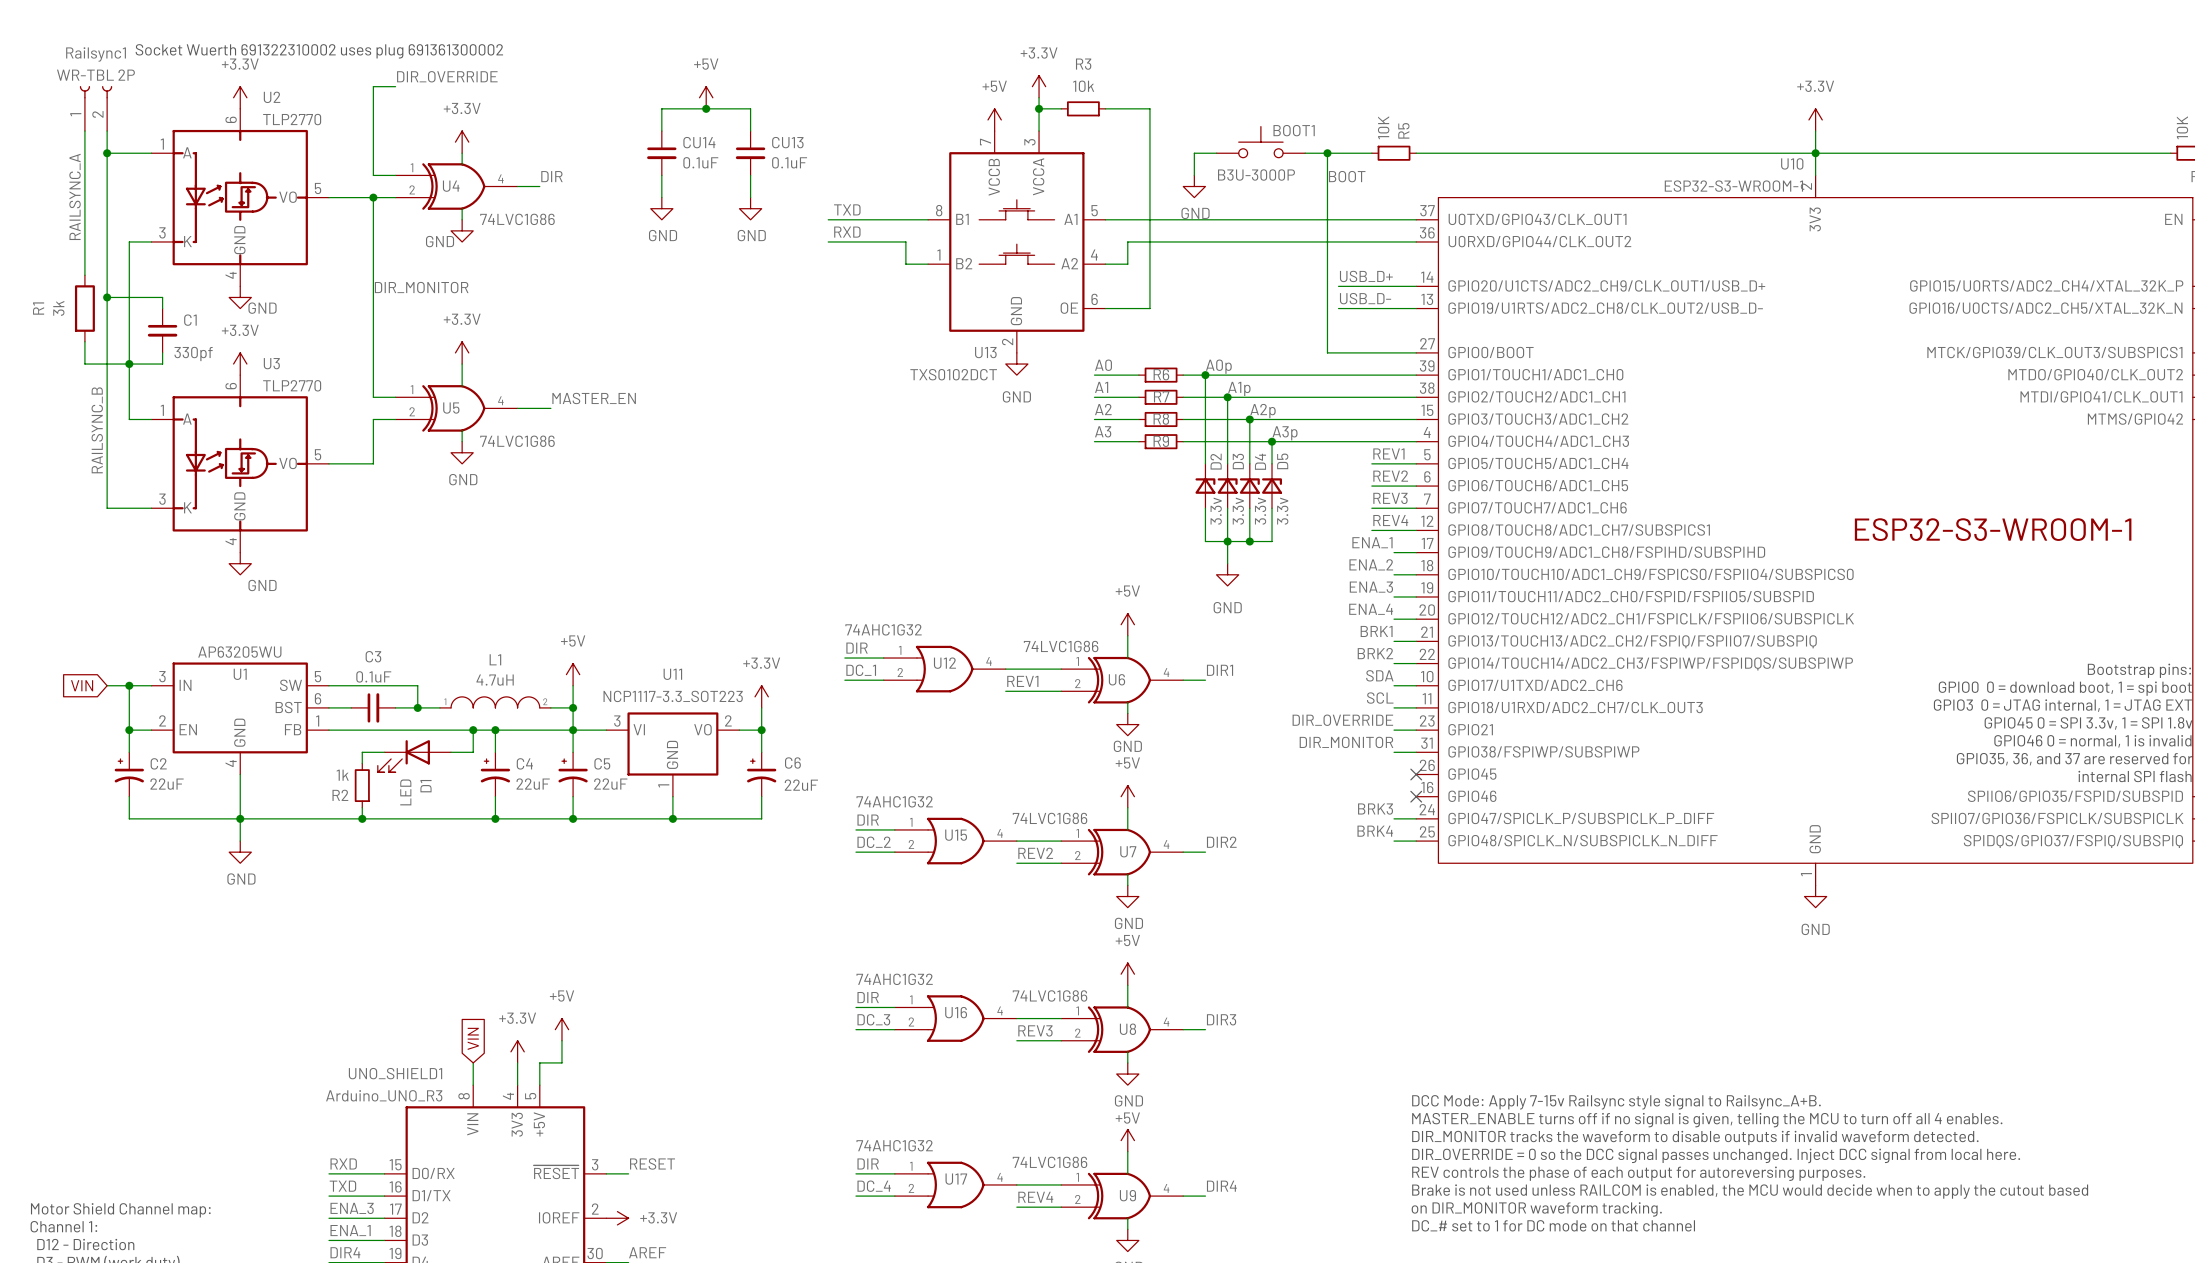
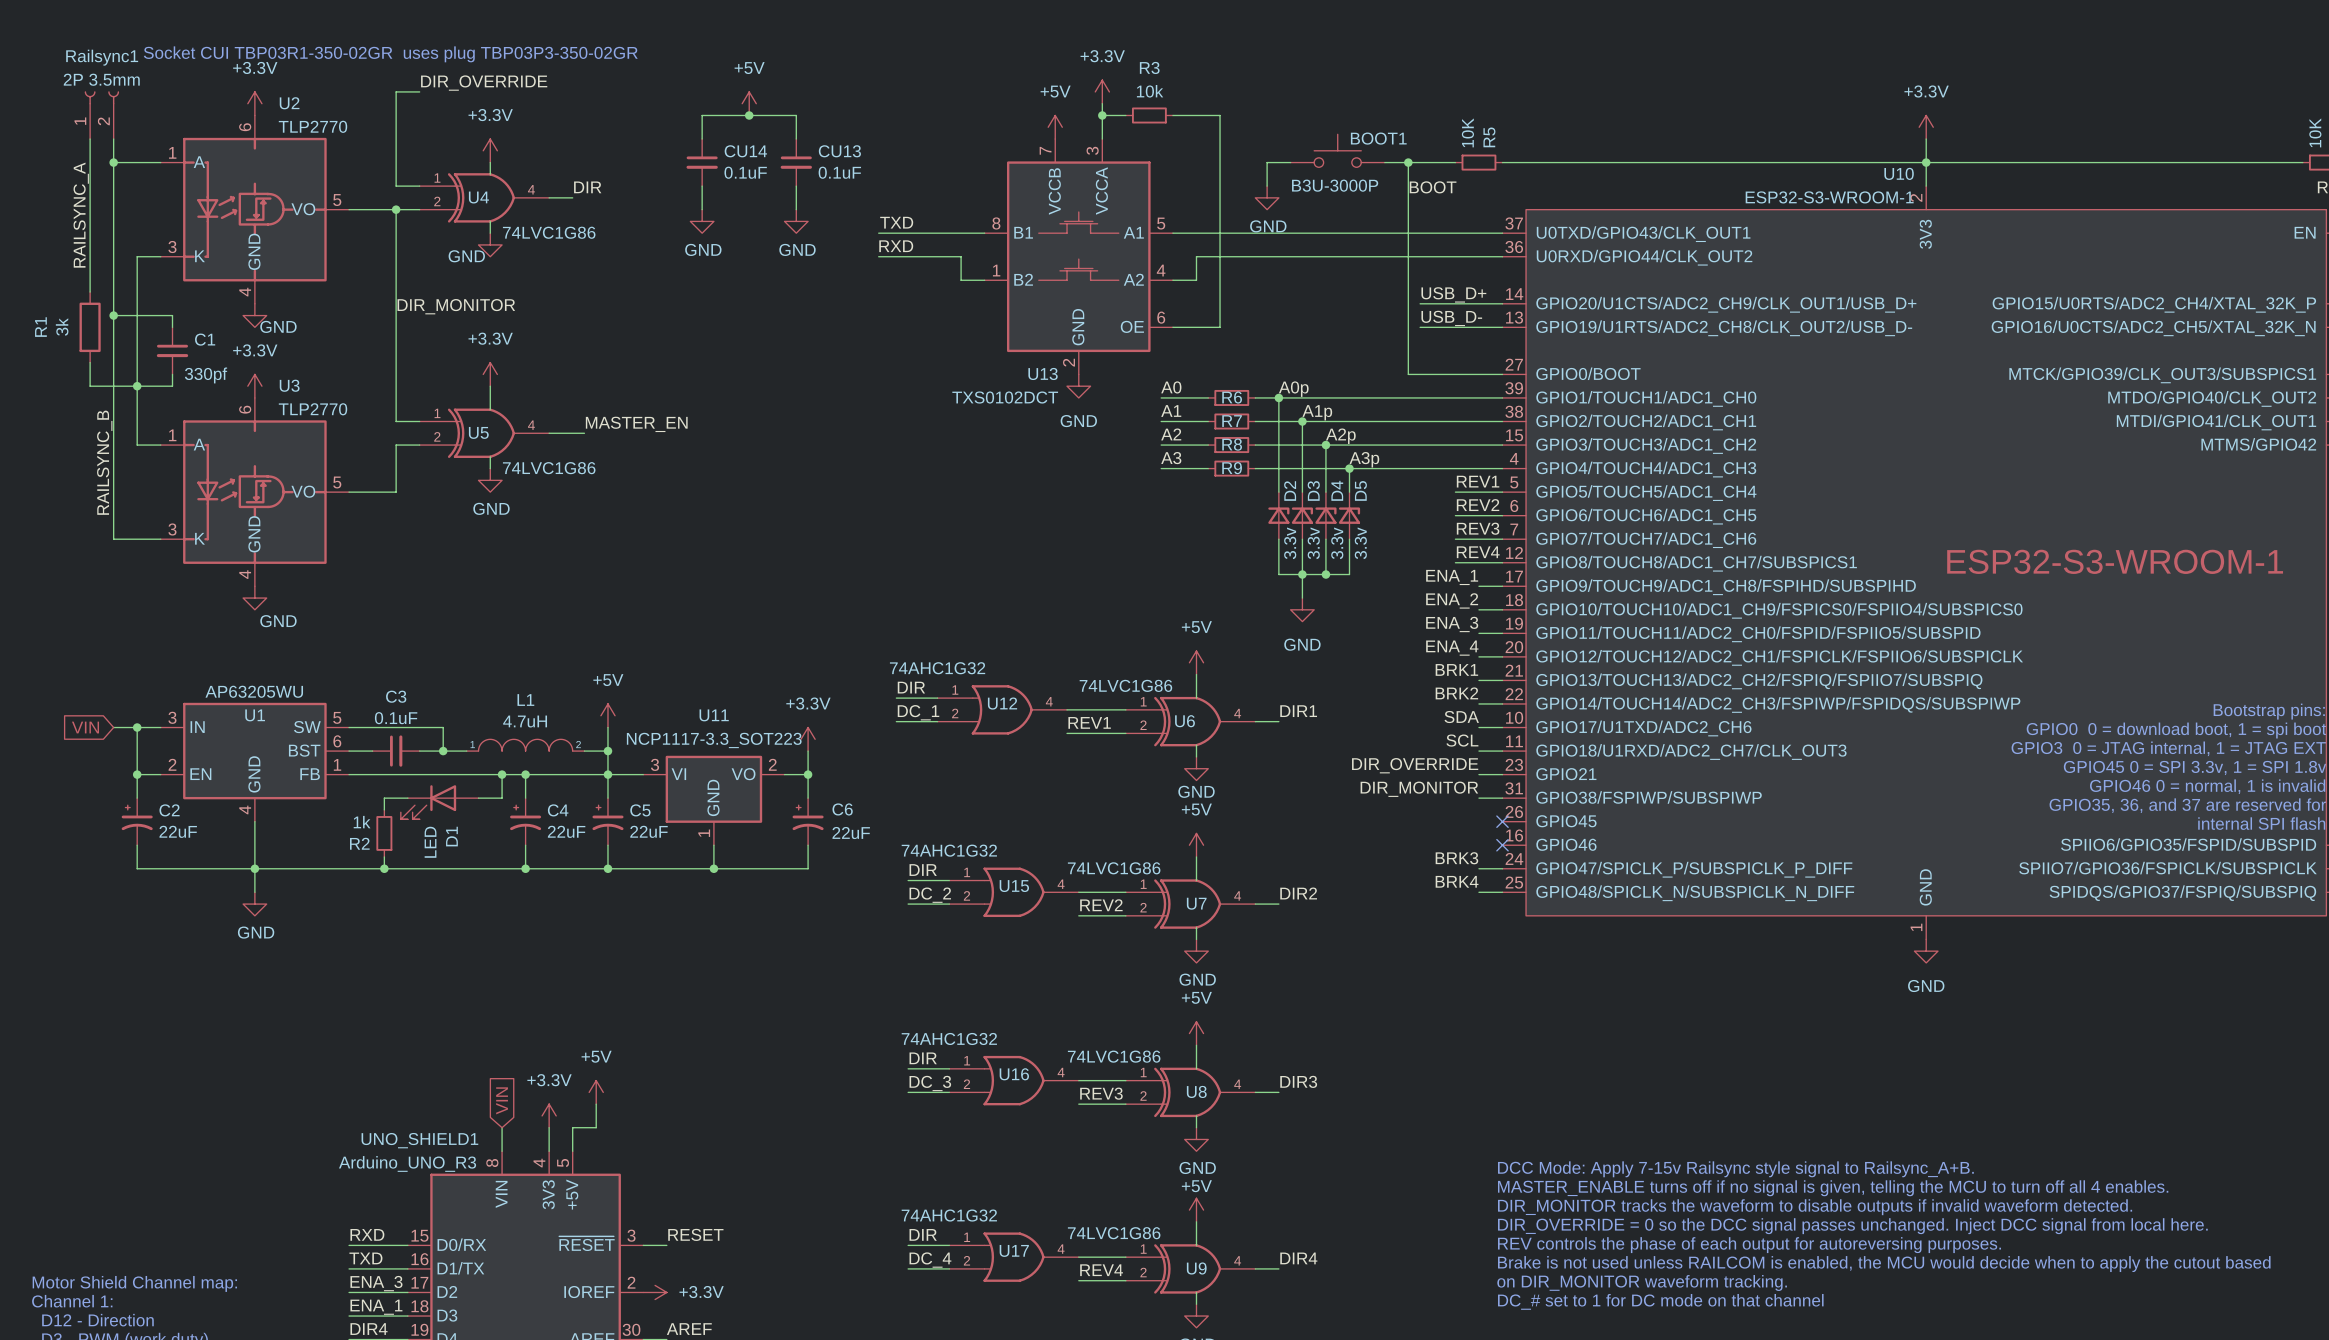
text: Socket Wuerth 691322310002 uses plug 691361300002 (319, 51) -> Socket CUI TBP03R1-350-02GR uses plug TBP03P3-350-02GR (390, 54)
Railsync1 value: WR-TBL 2P (95, 75) -> 2P 3.5mm (101, 79)

